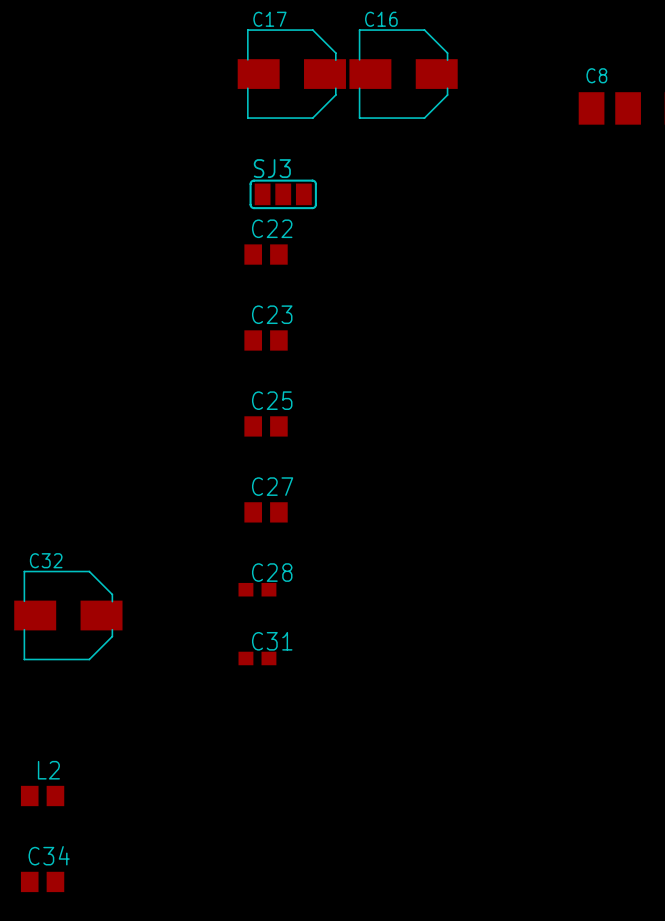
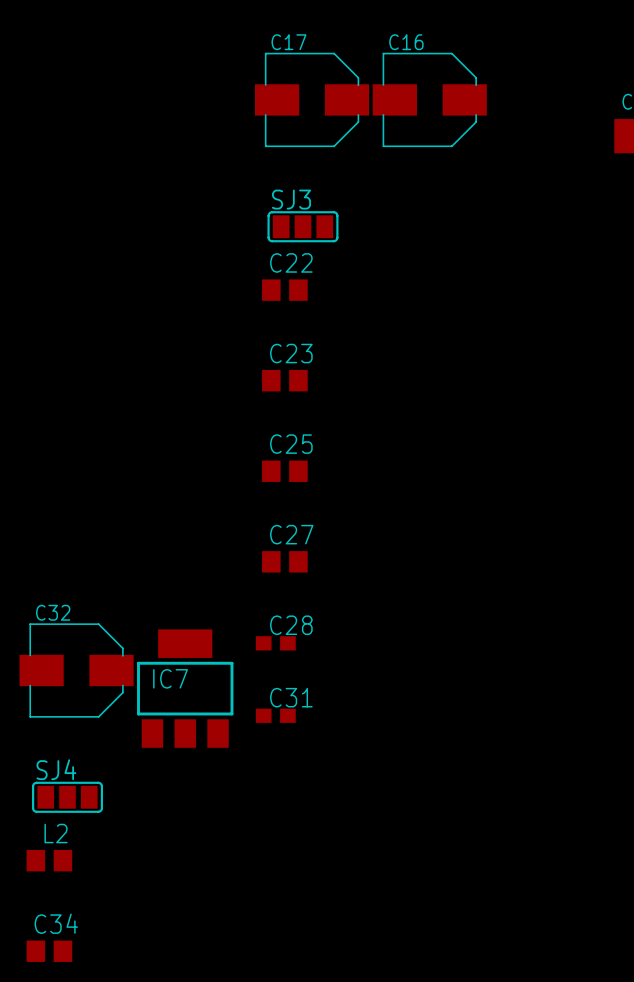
IC7: none -> (185, 688)
SJ4: none -> (67, 797)

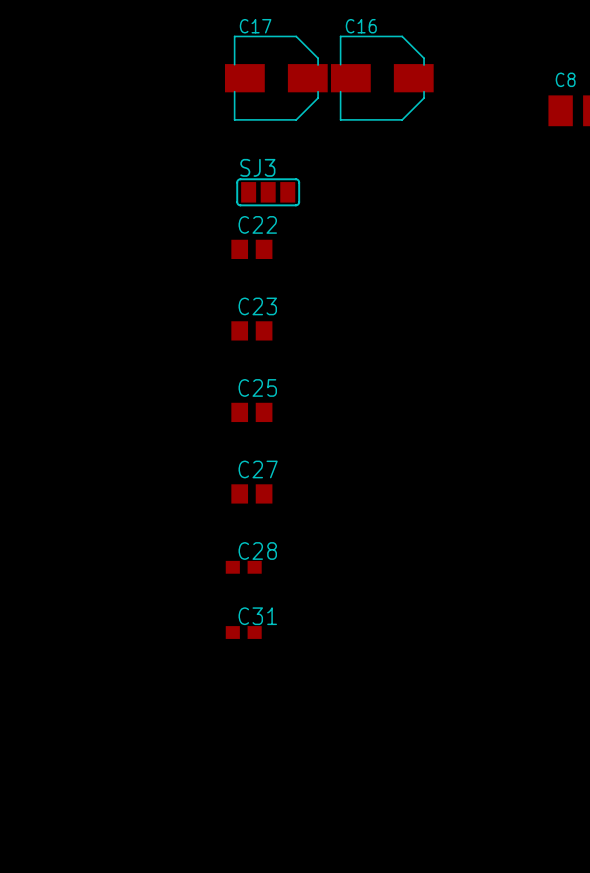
C32: (76, 670) -> none
IC7: (185, 688) -> none
SJ4: (67, 797) -> none
L2: (49, 860) -> none
C34: (49, 951) -> none

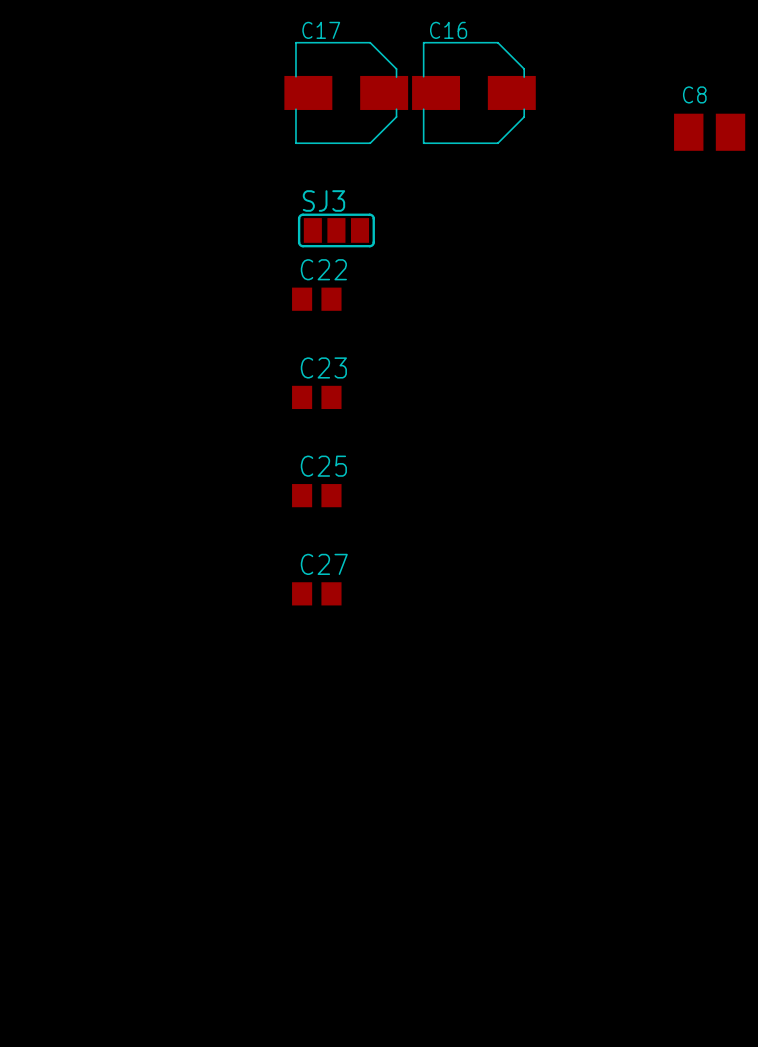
C28: (243, 567) -> none
C31: (243, 632) -> none

